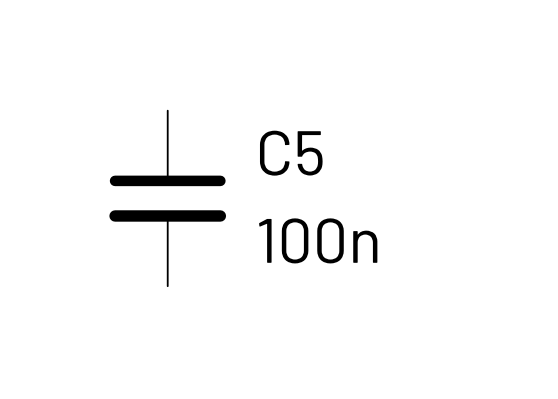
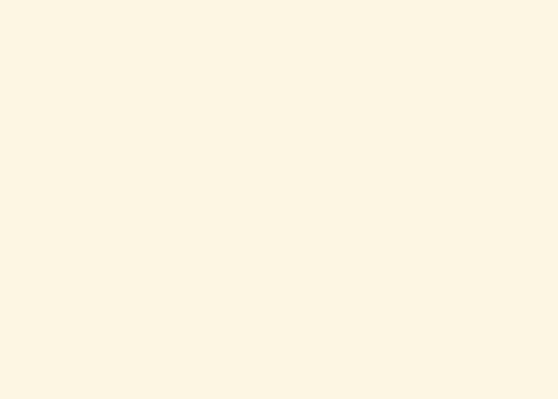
C5: 100n (167, 198) -> none

